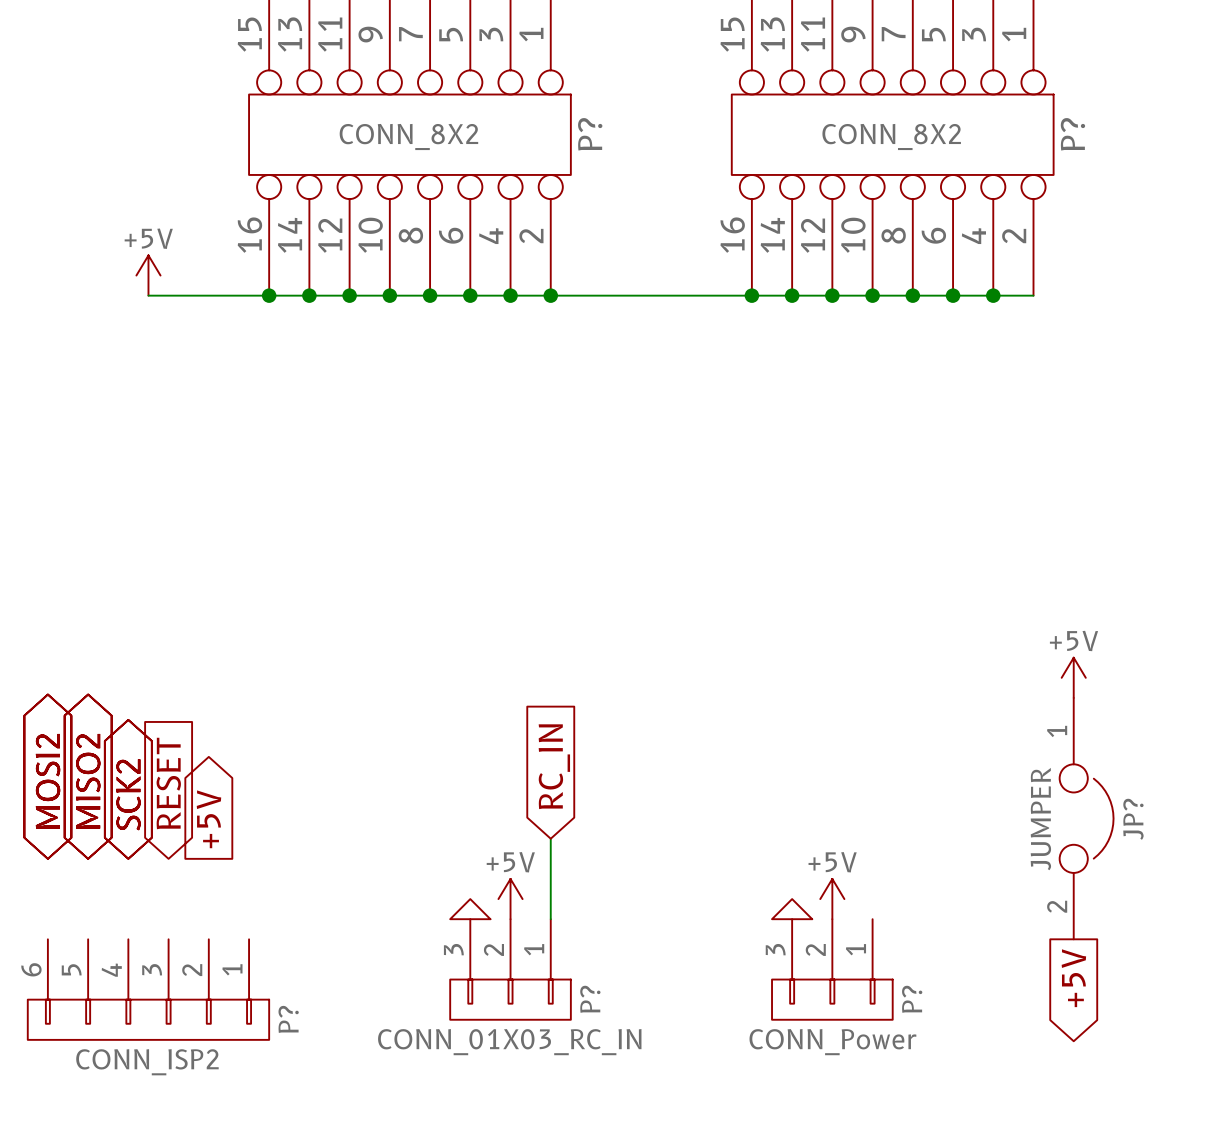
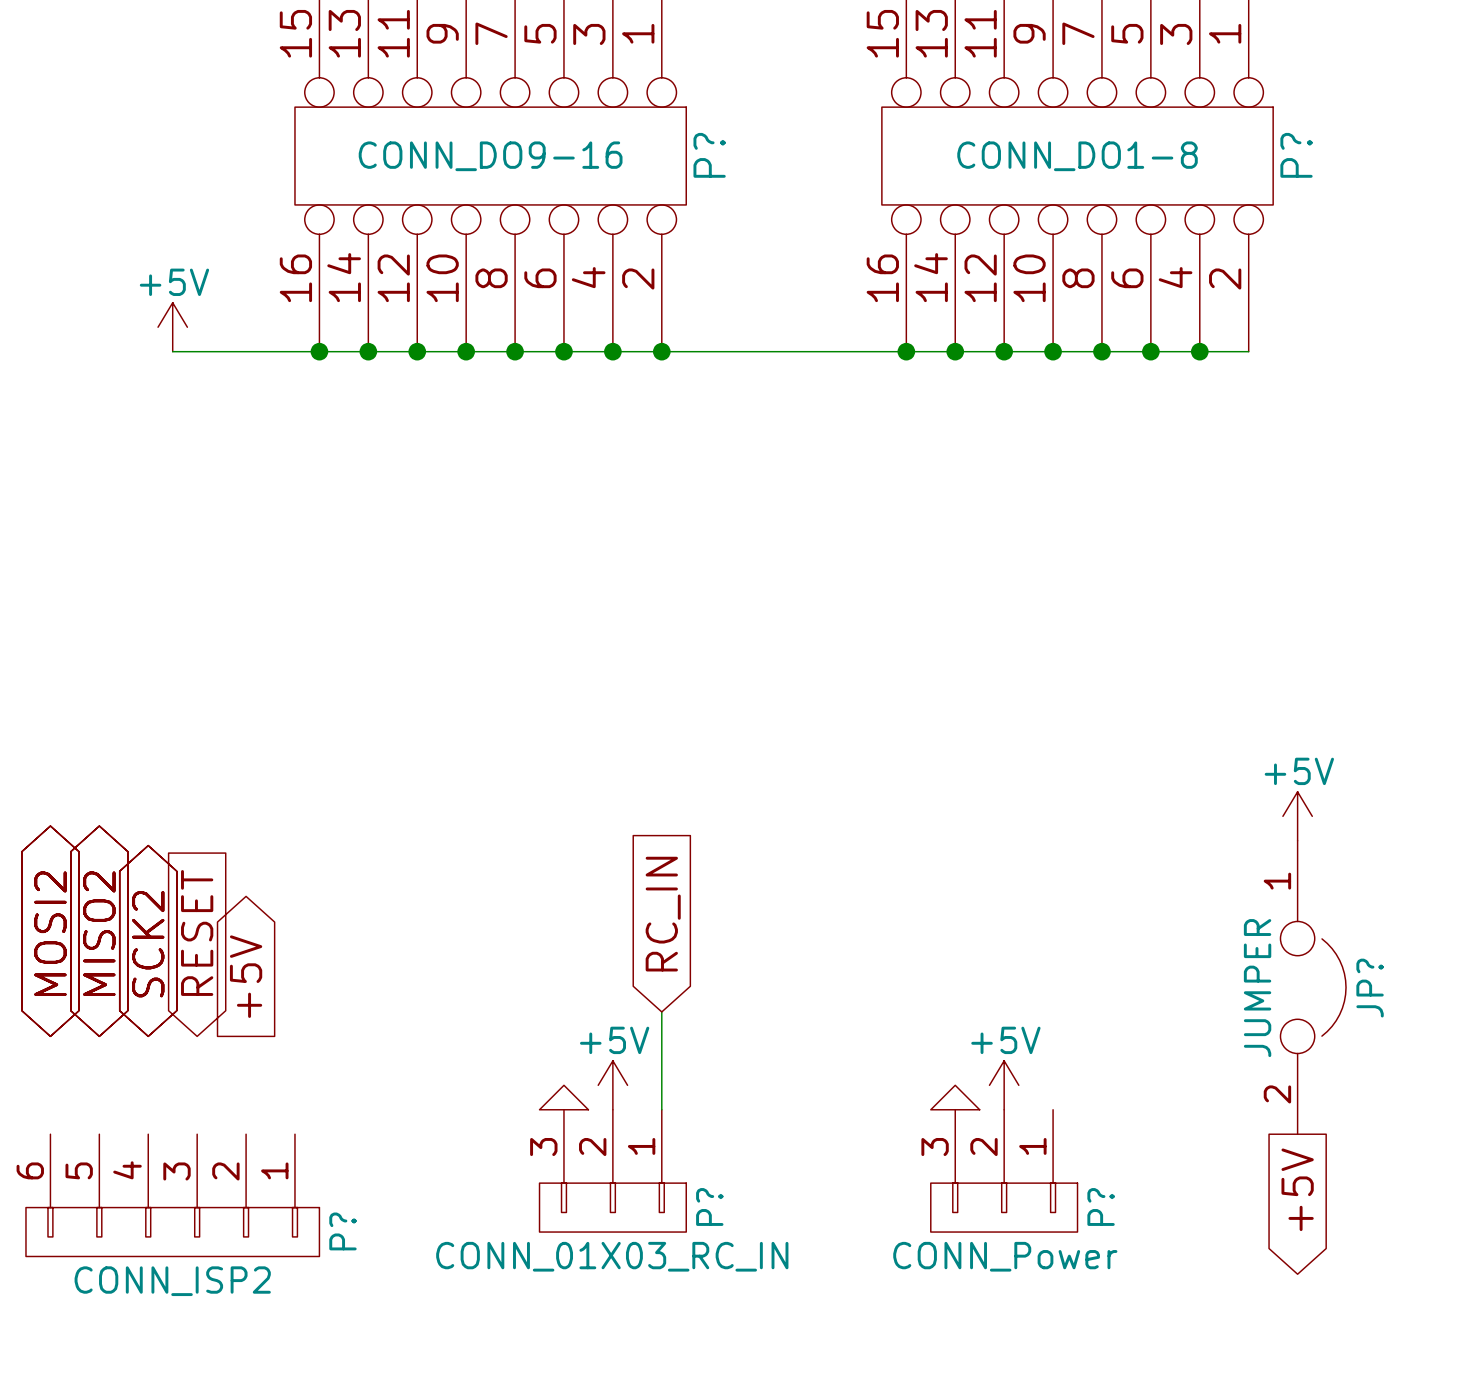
P? value: CONN_8X2 (408, 137) -> CONN_DO9-16 (490, 156)
P? value: CONN_8X2 (891, 137) -> CONN_DO1-8 (1077, 156)

